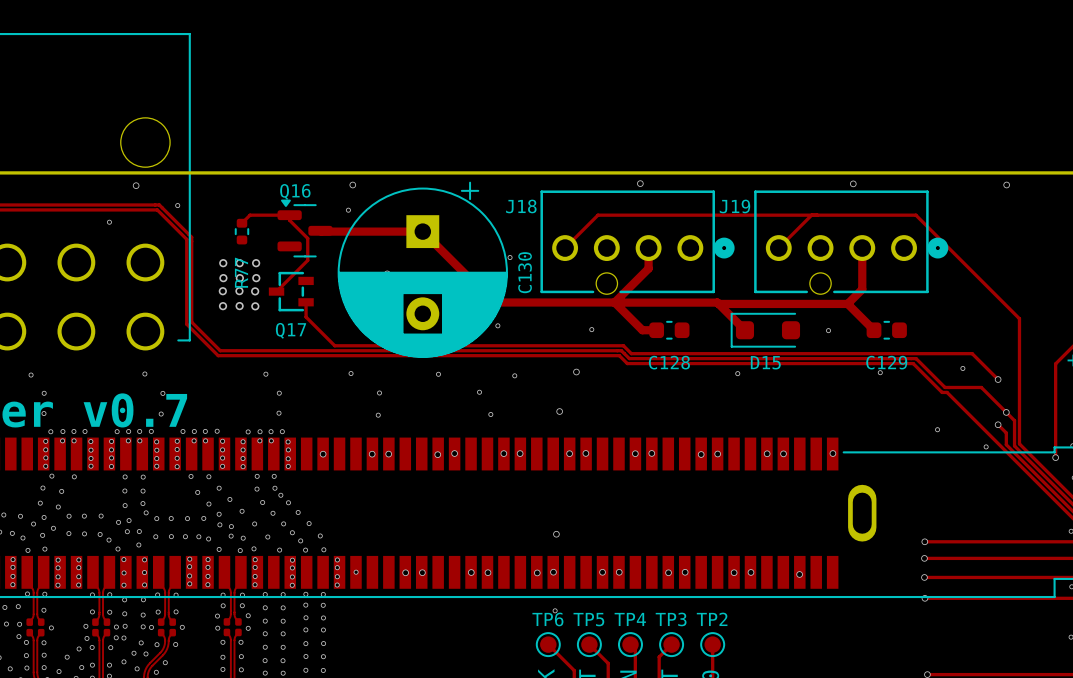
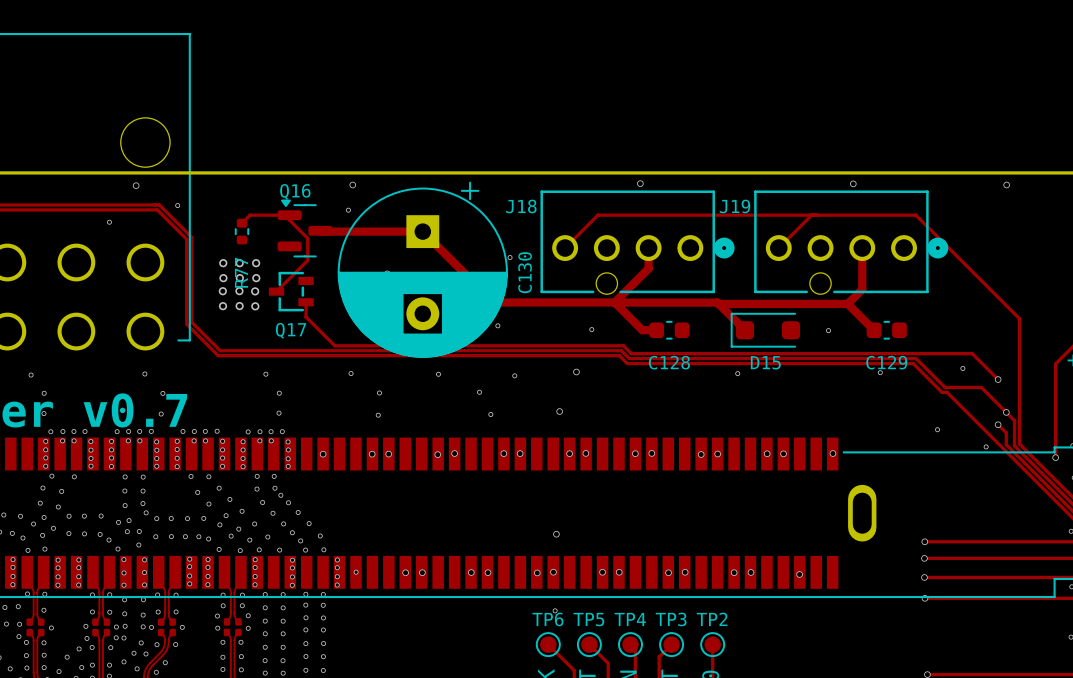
via: (219, 514) -> none
via: none -> (226, 515)
via: (231, 526) -> none
via: none -> (238, 529)
via: (243, 538) -> none
via: none -> (249, 540)
via: (253, 548) -> none
via: none -> (259, 549)

